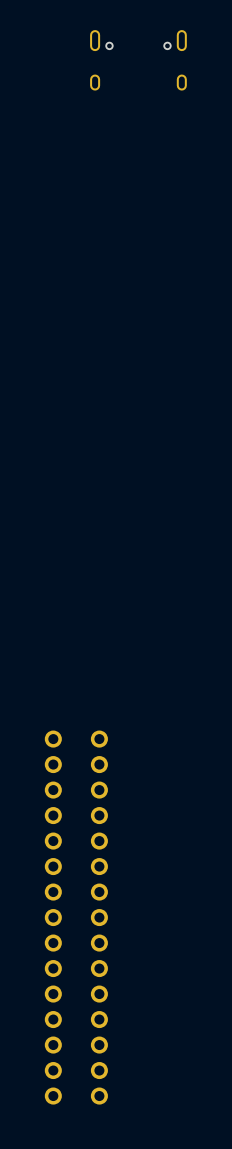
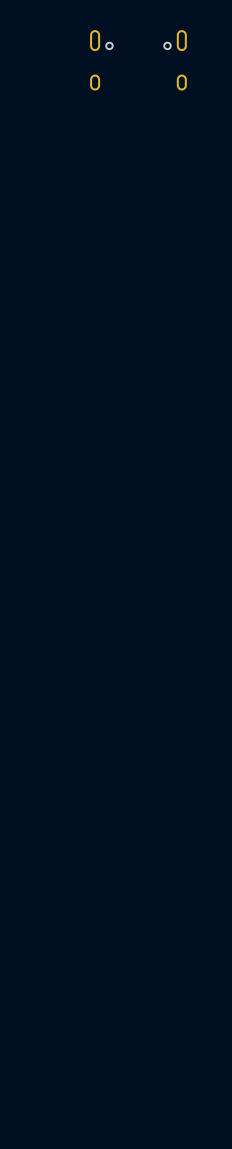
part: (53, 917) -> none
part: (99, 917) -> none

